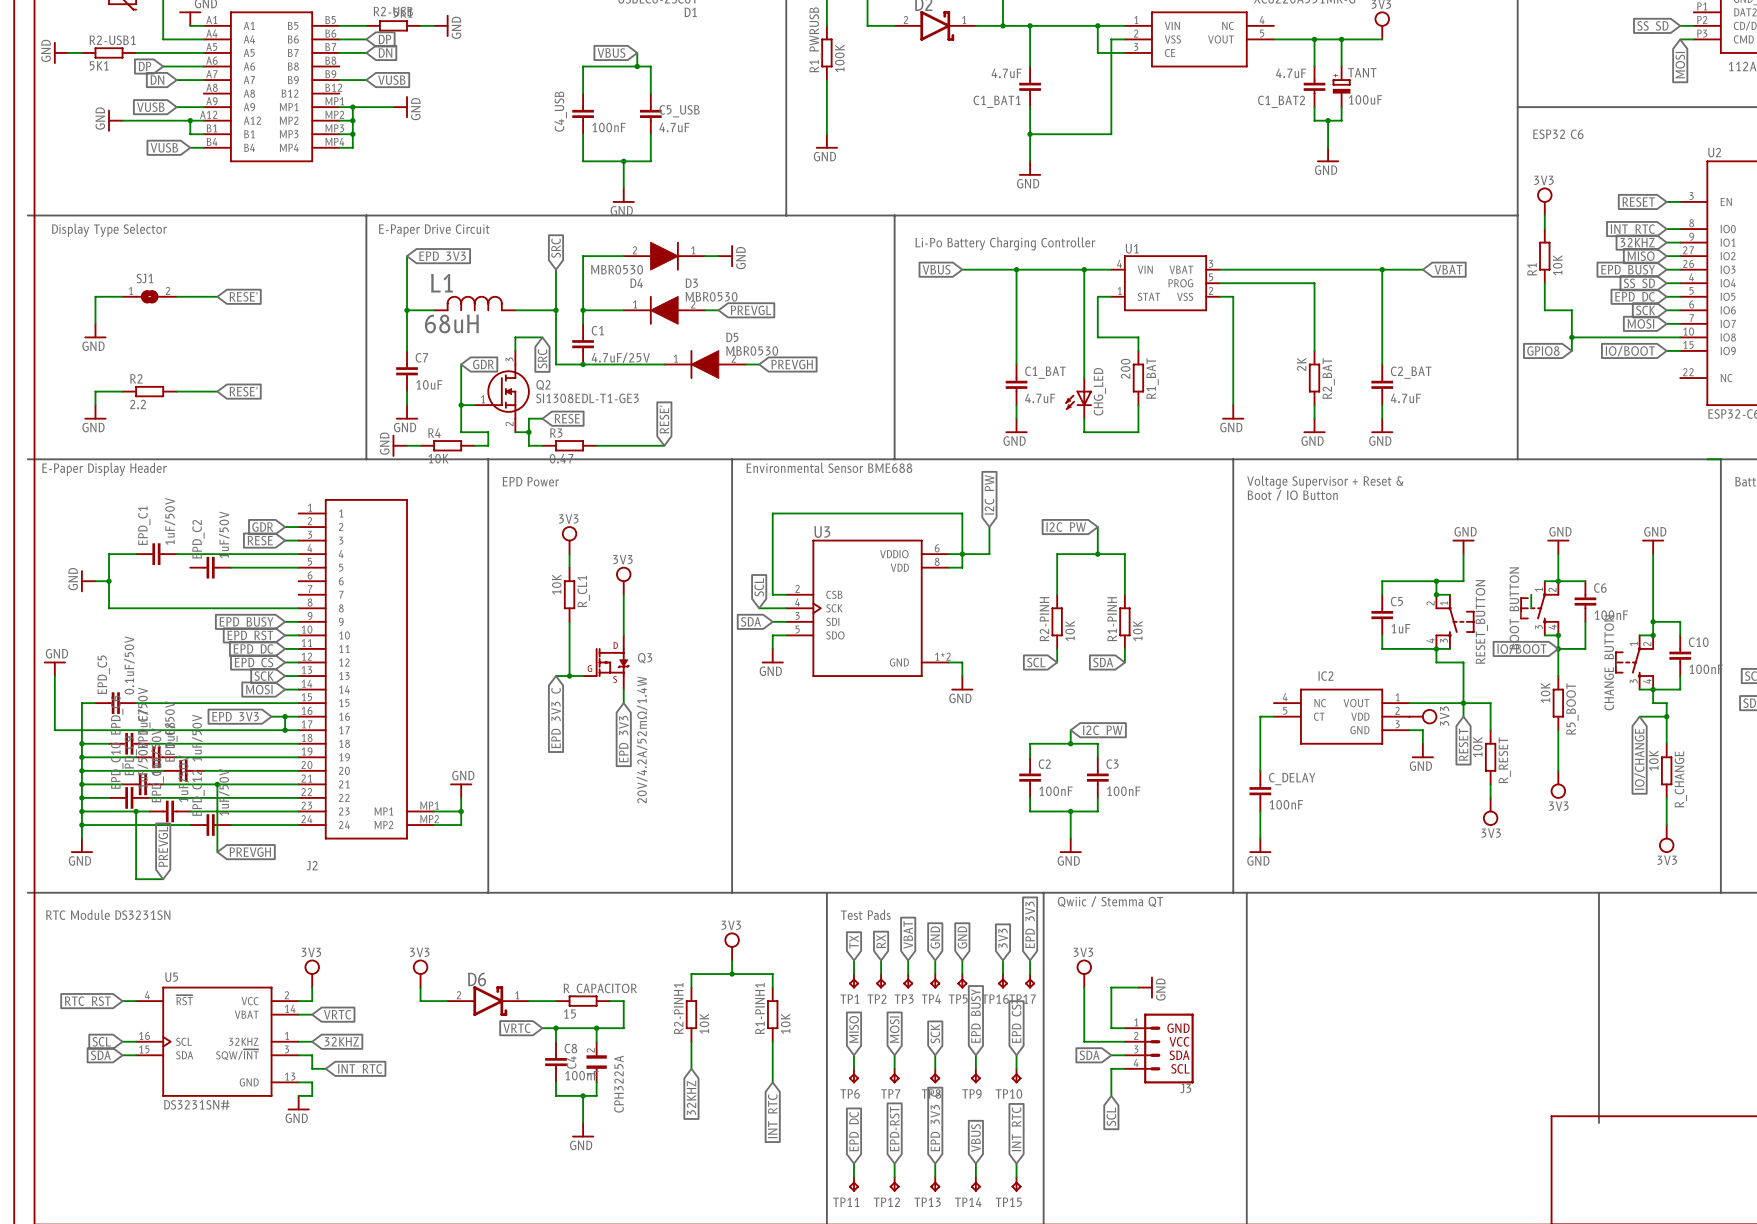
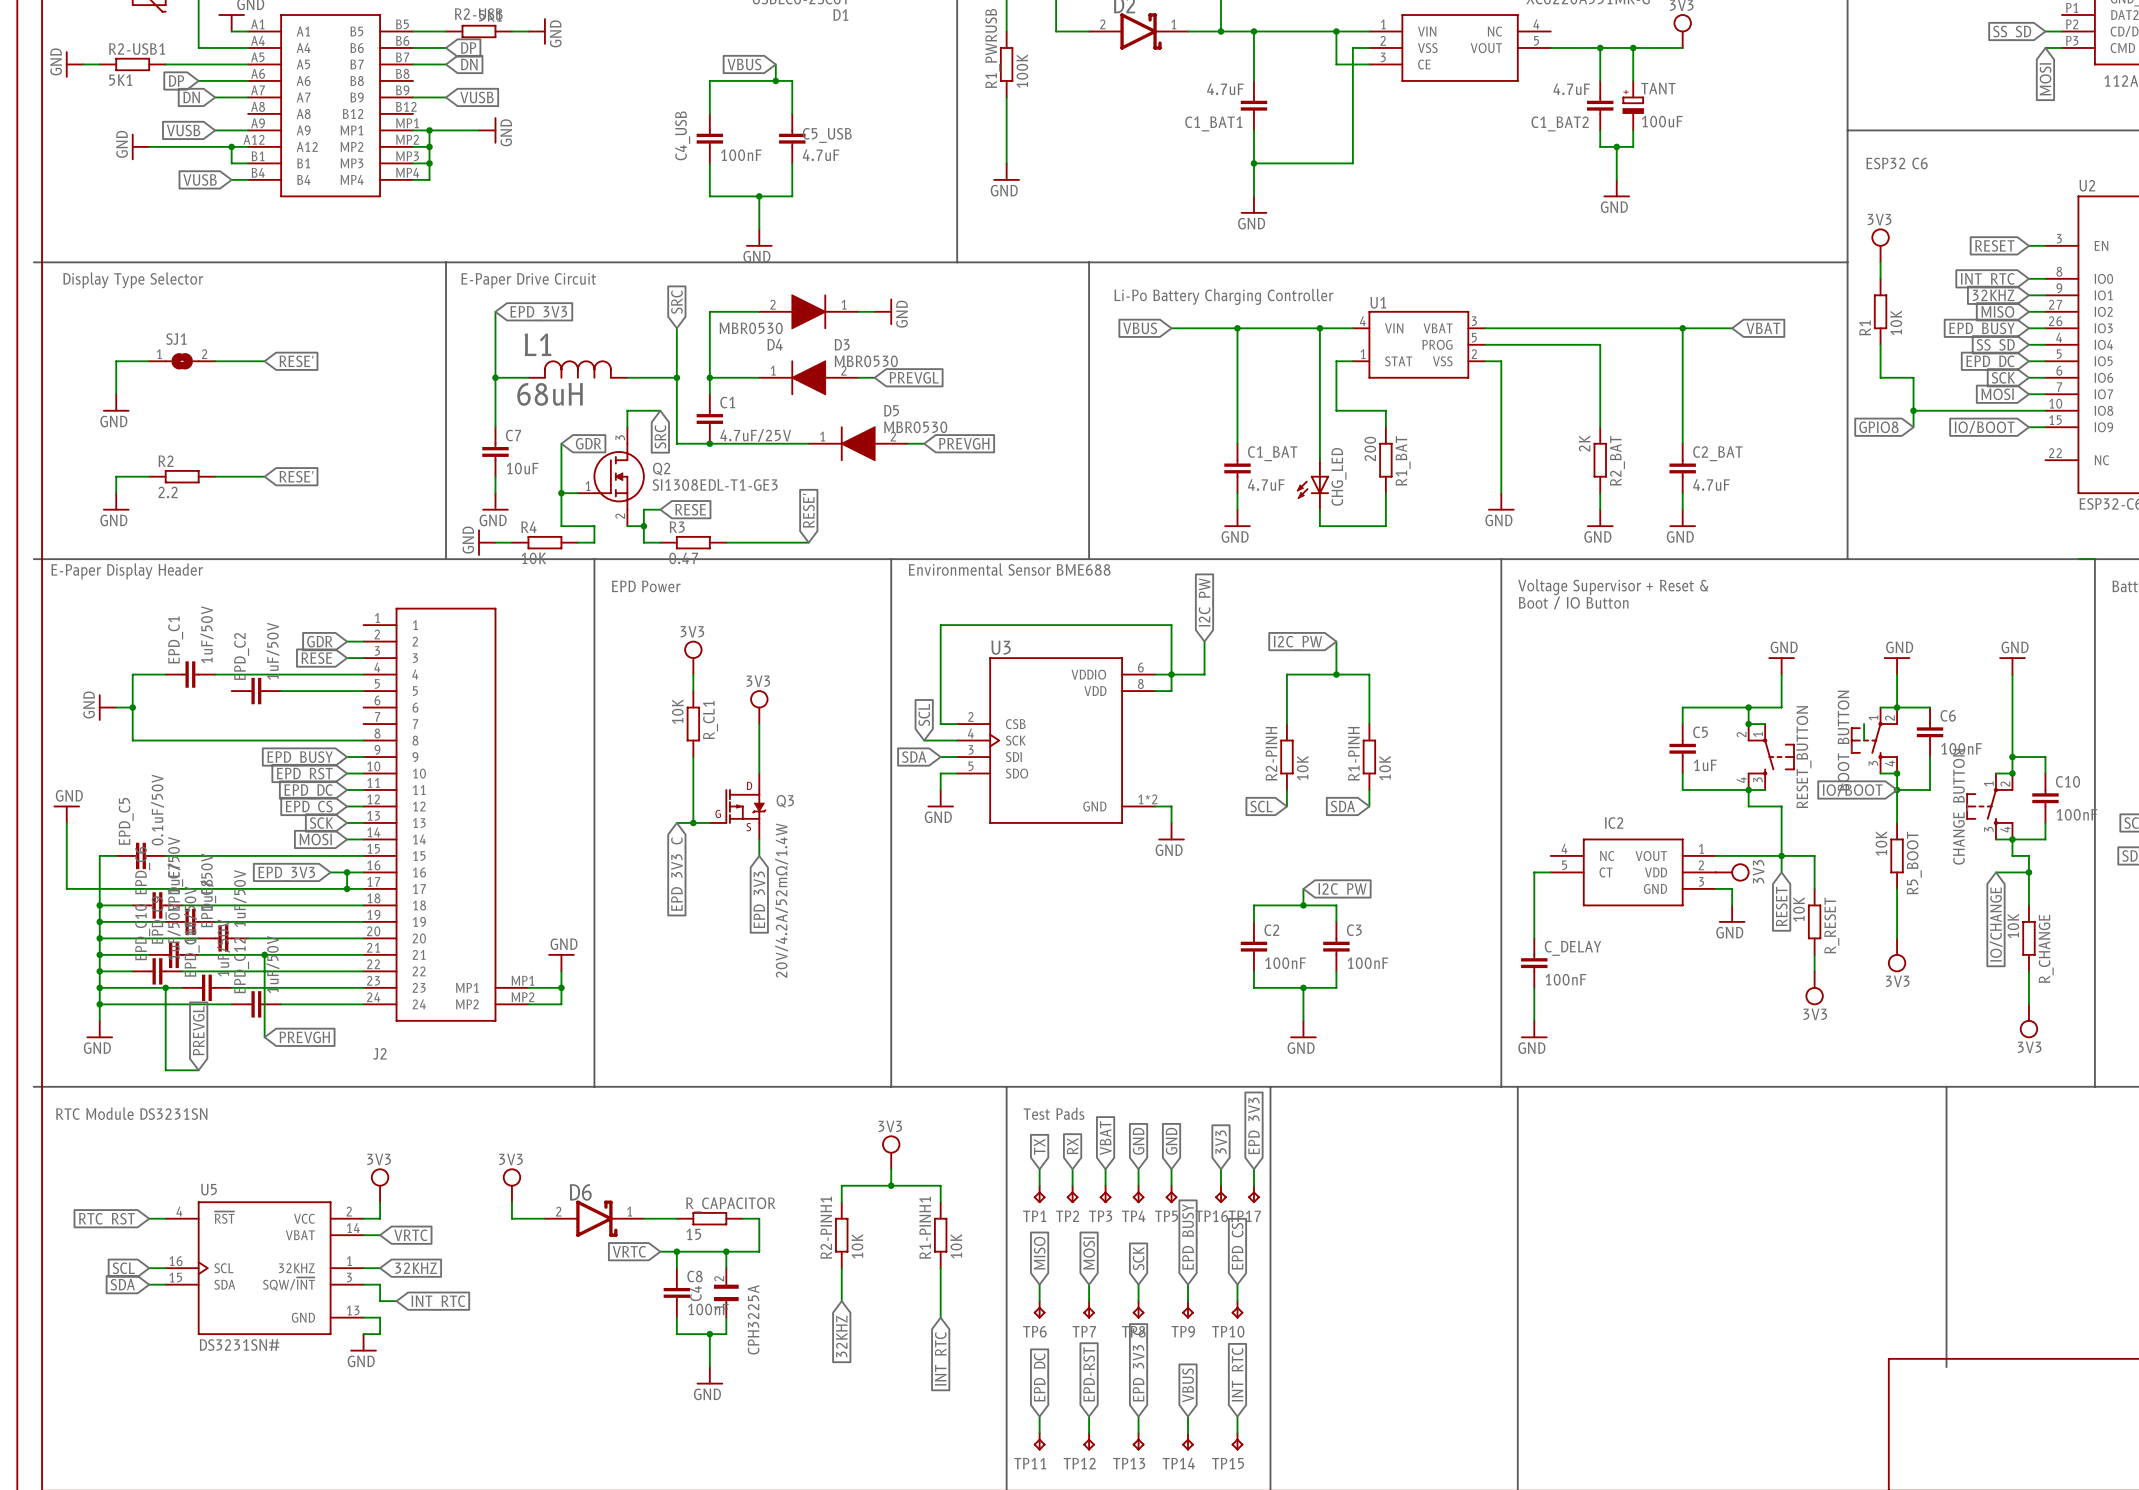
text: Qwiic / Stemma QT (1110, 901) -> none
power symbol: 3V3 (1084, 973) -> none
wire: (1084, 987) (1084, 1041) (1124, 1041) -> none
wire: (1138, 987) (1111, 987) (1111, 1028) (1124, 1028) -> none
power symbol: GND (1145, 987) -> none
J3: (1159, 1048) -> none
global label: SDA (1089, 1055) -> none
wire: (1111, 1055) (1124, 1055) -> none
wire: (1124, 1068) (1111, 1068) (1111, 1095) -> none
global label: SCL (1111, 1116) -> none

